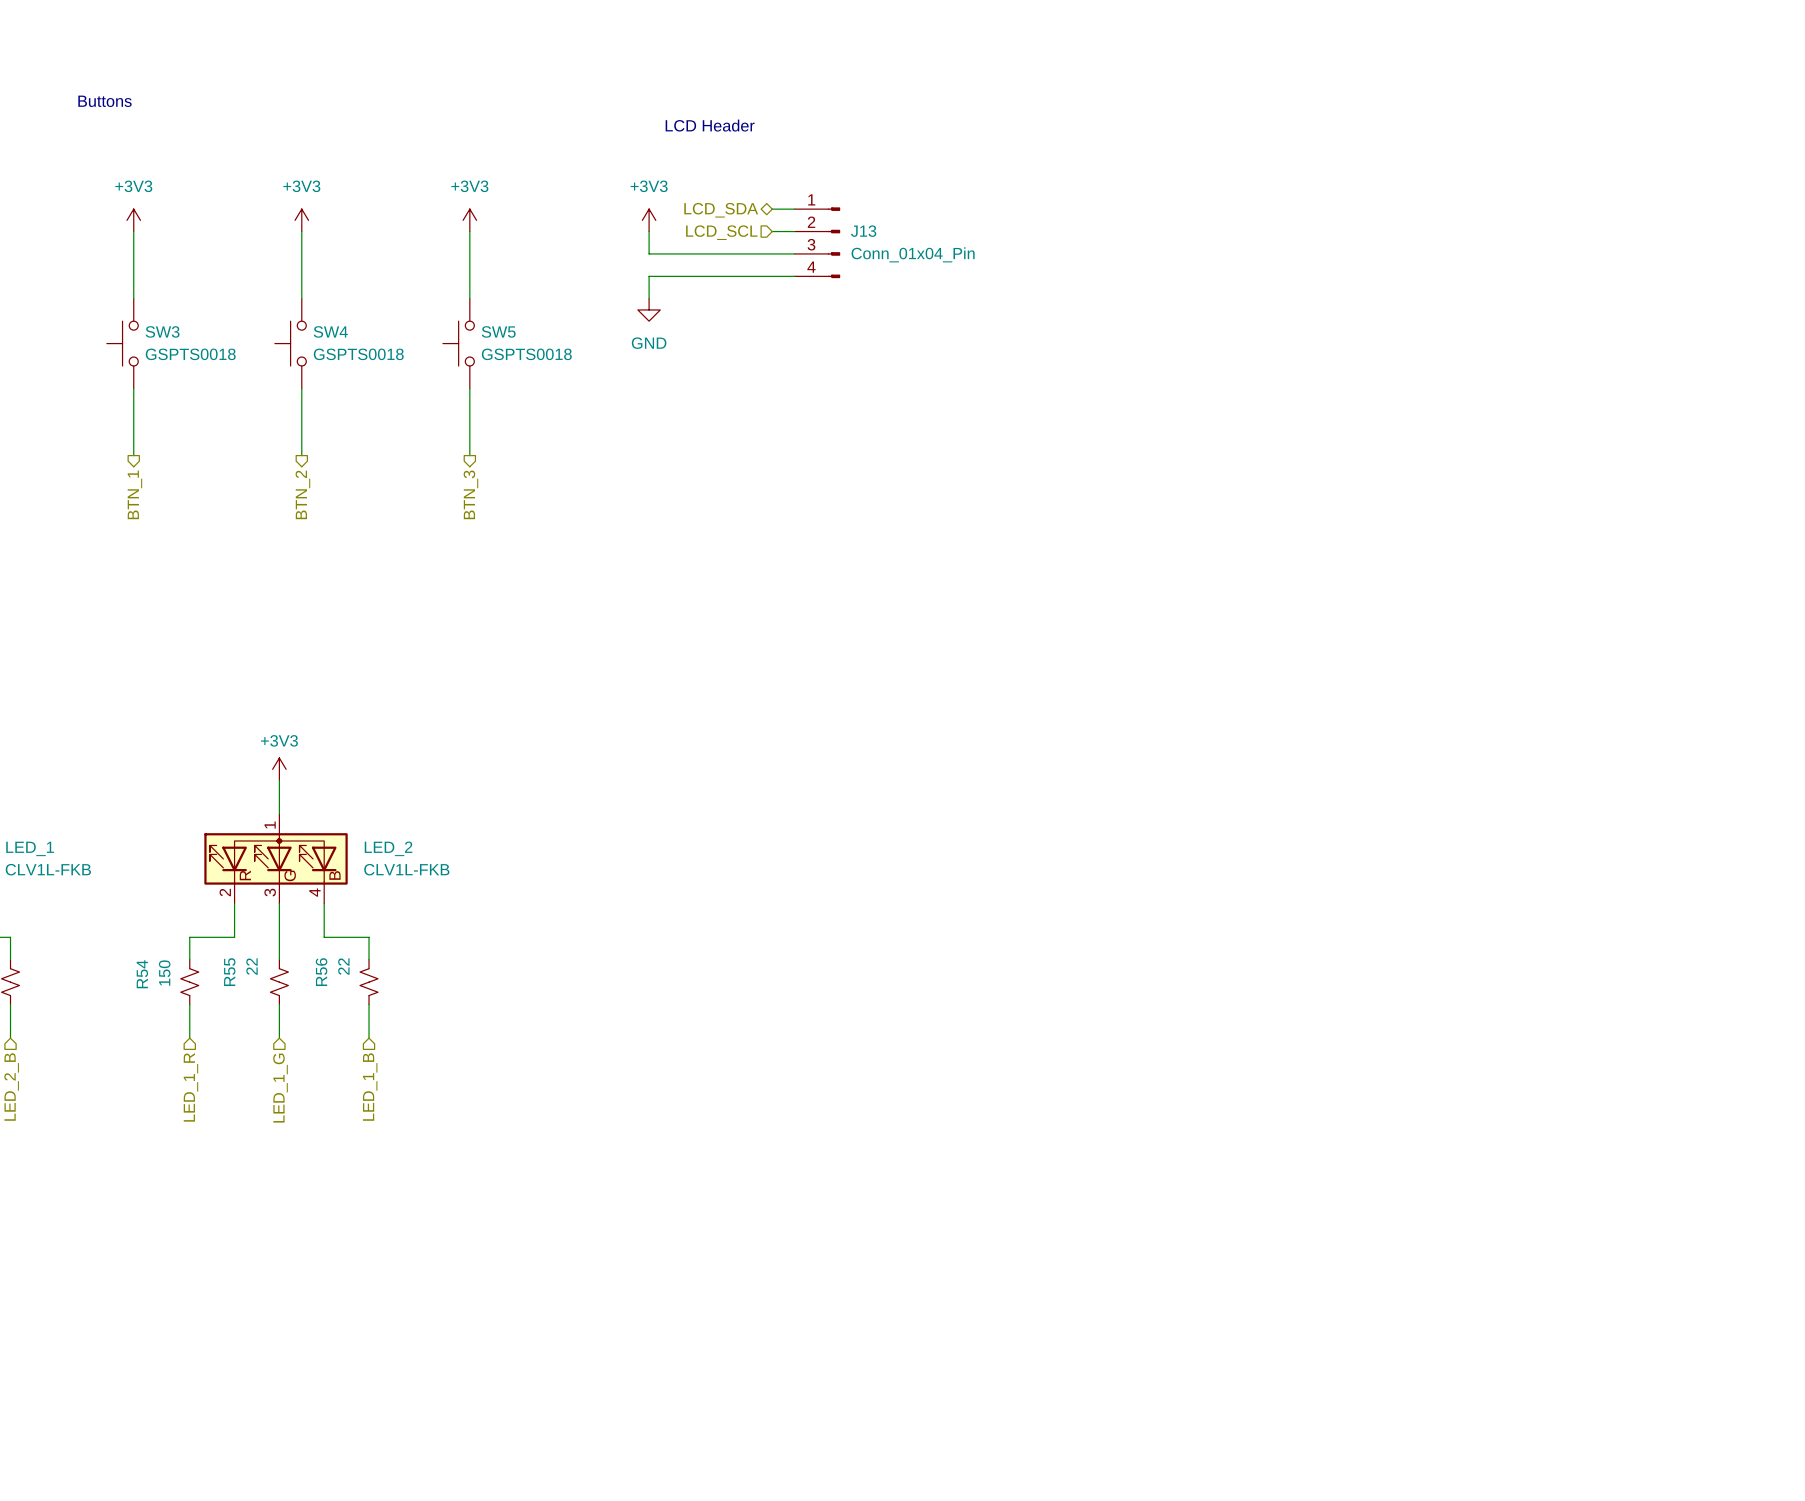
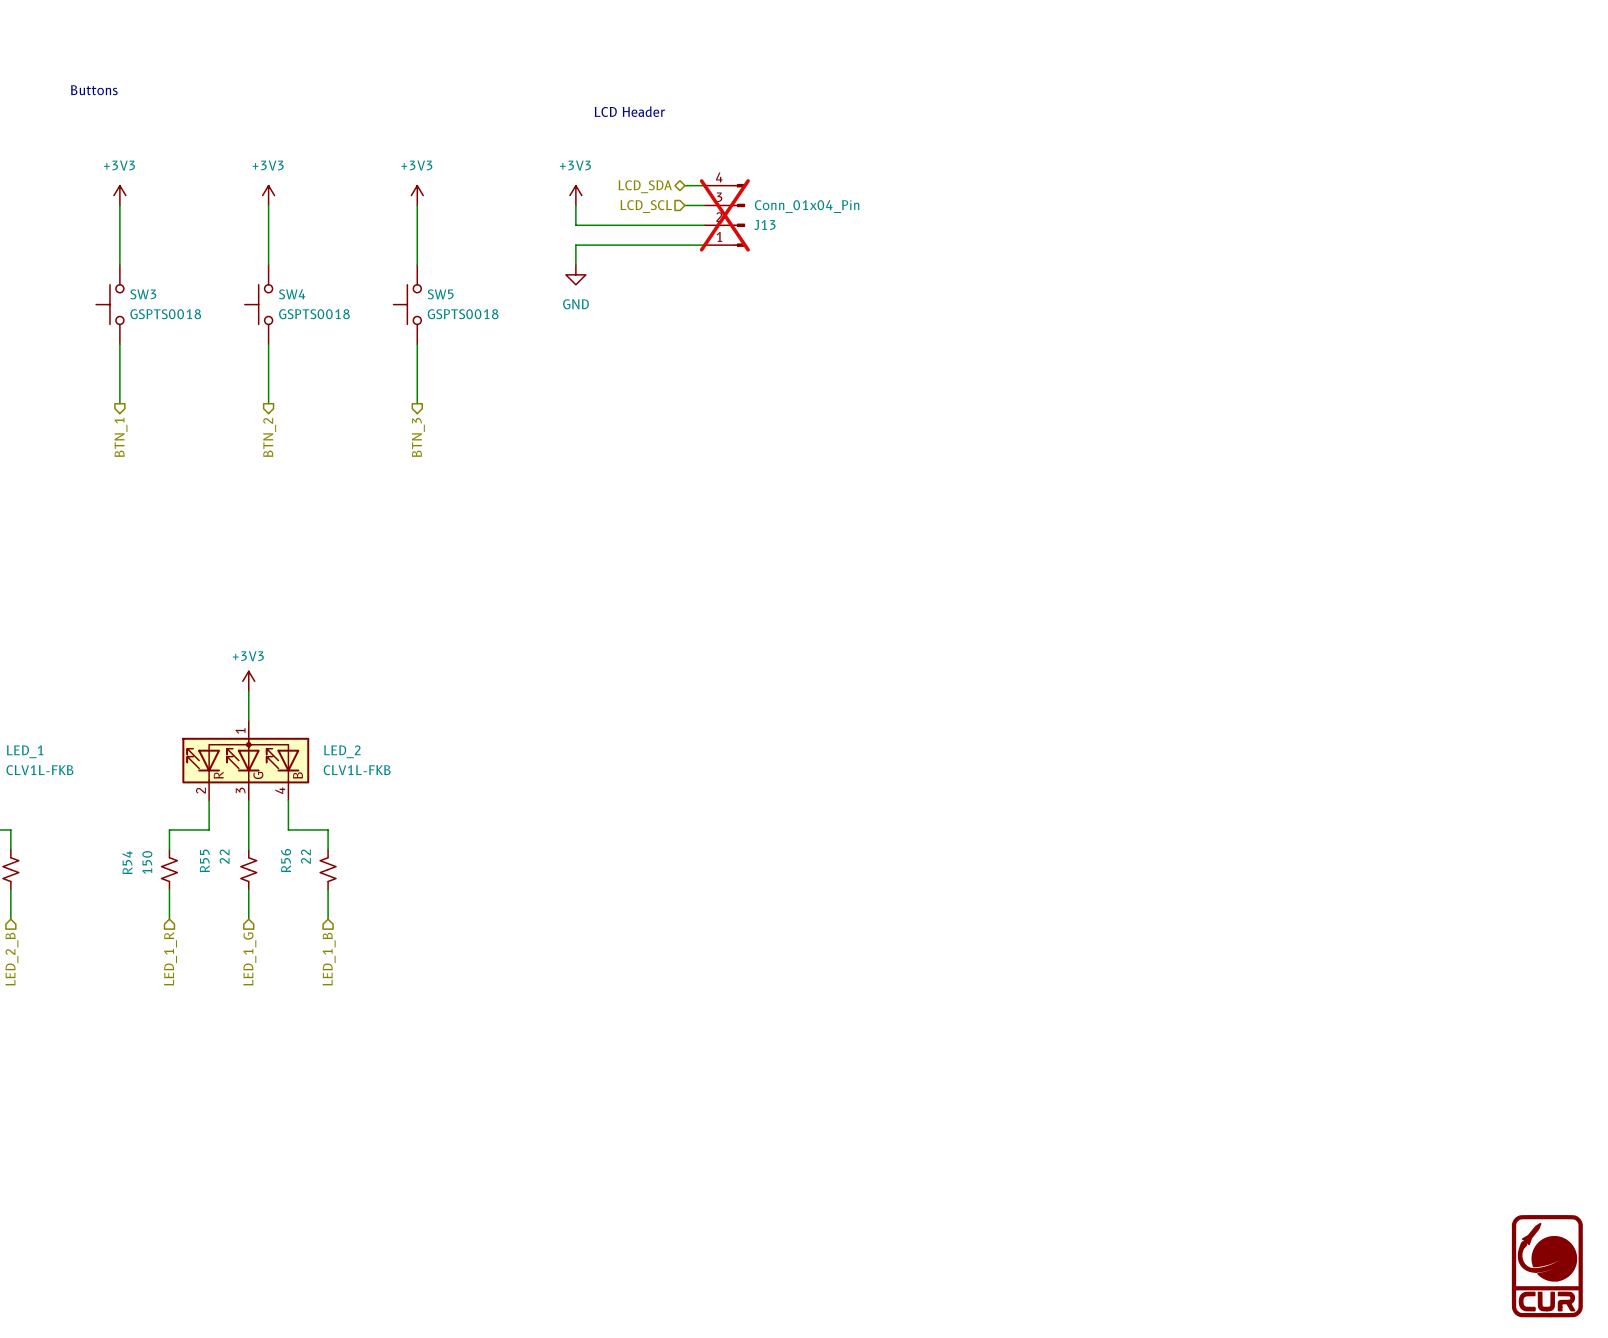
J13 do-not-place cross: none -> (724, 215)
J13 flip: as is (833, 242) -> up-down (739, 215)
power symbol: none -> (1547, 1266)

